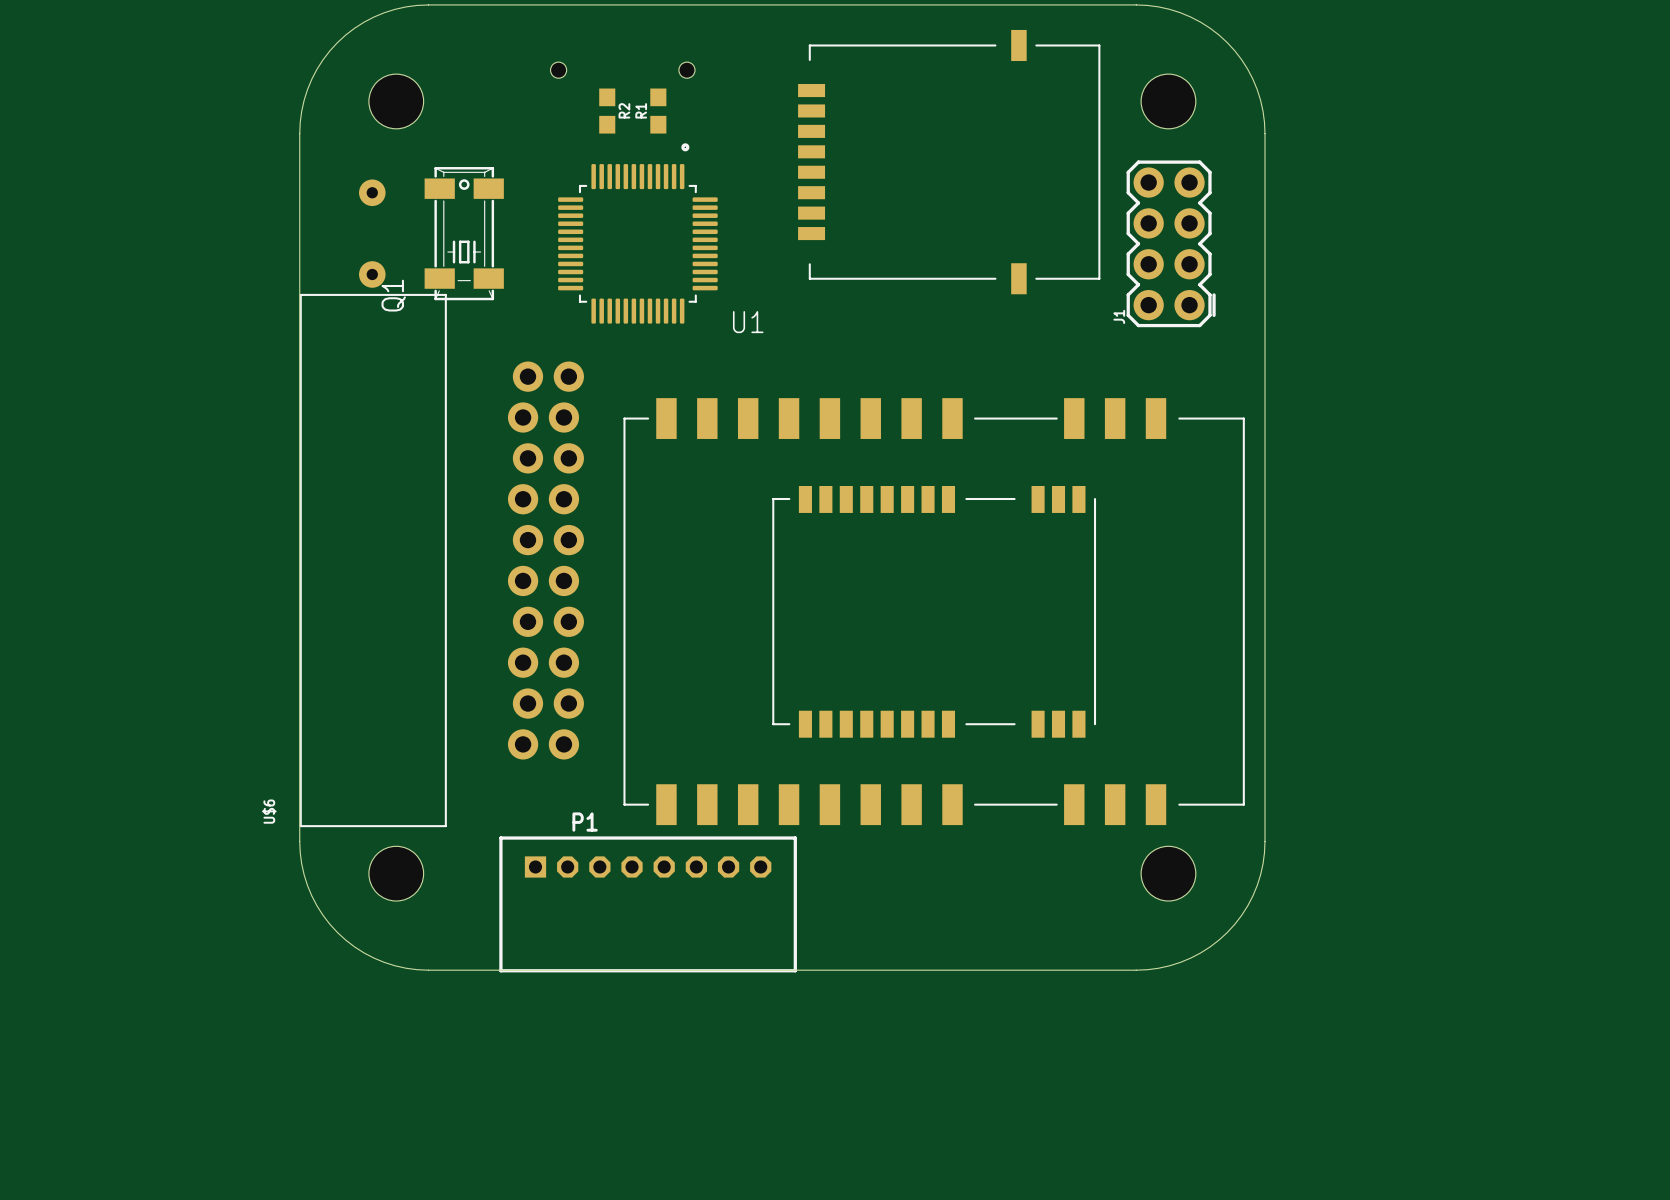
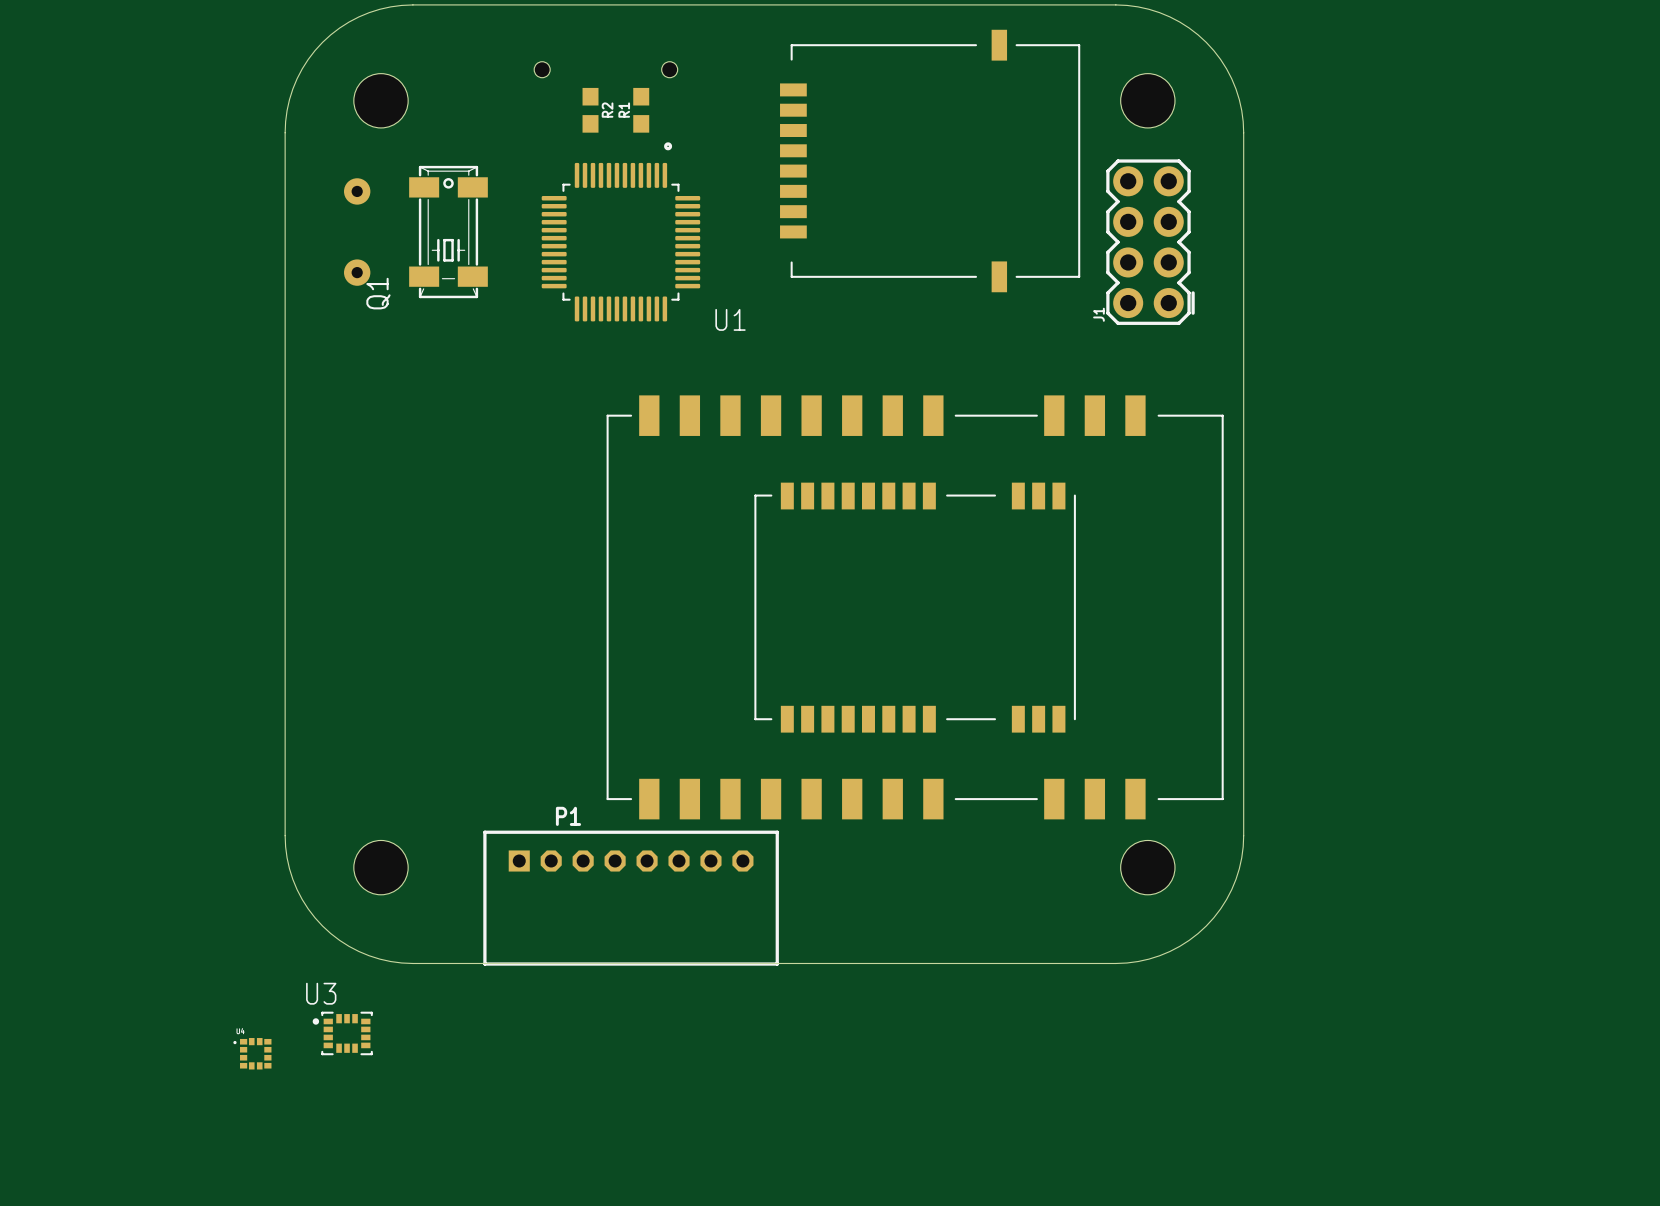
U$6: (441, 560) -> none
U3: none -> (342, 1033)
part: none -> (252, 1053)

